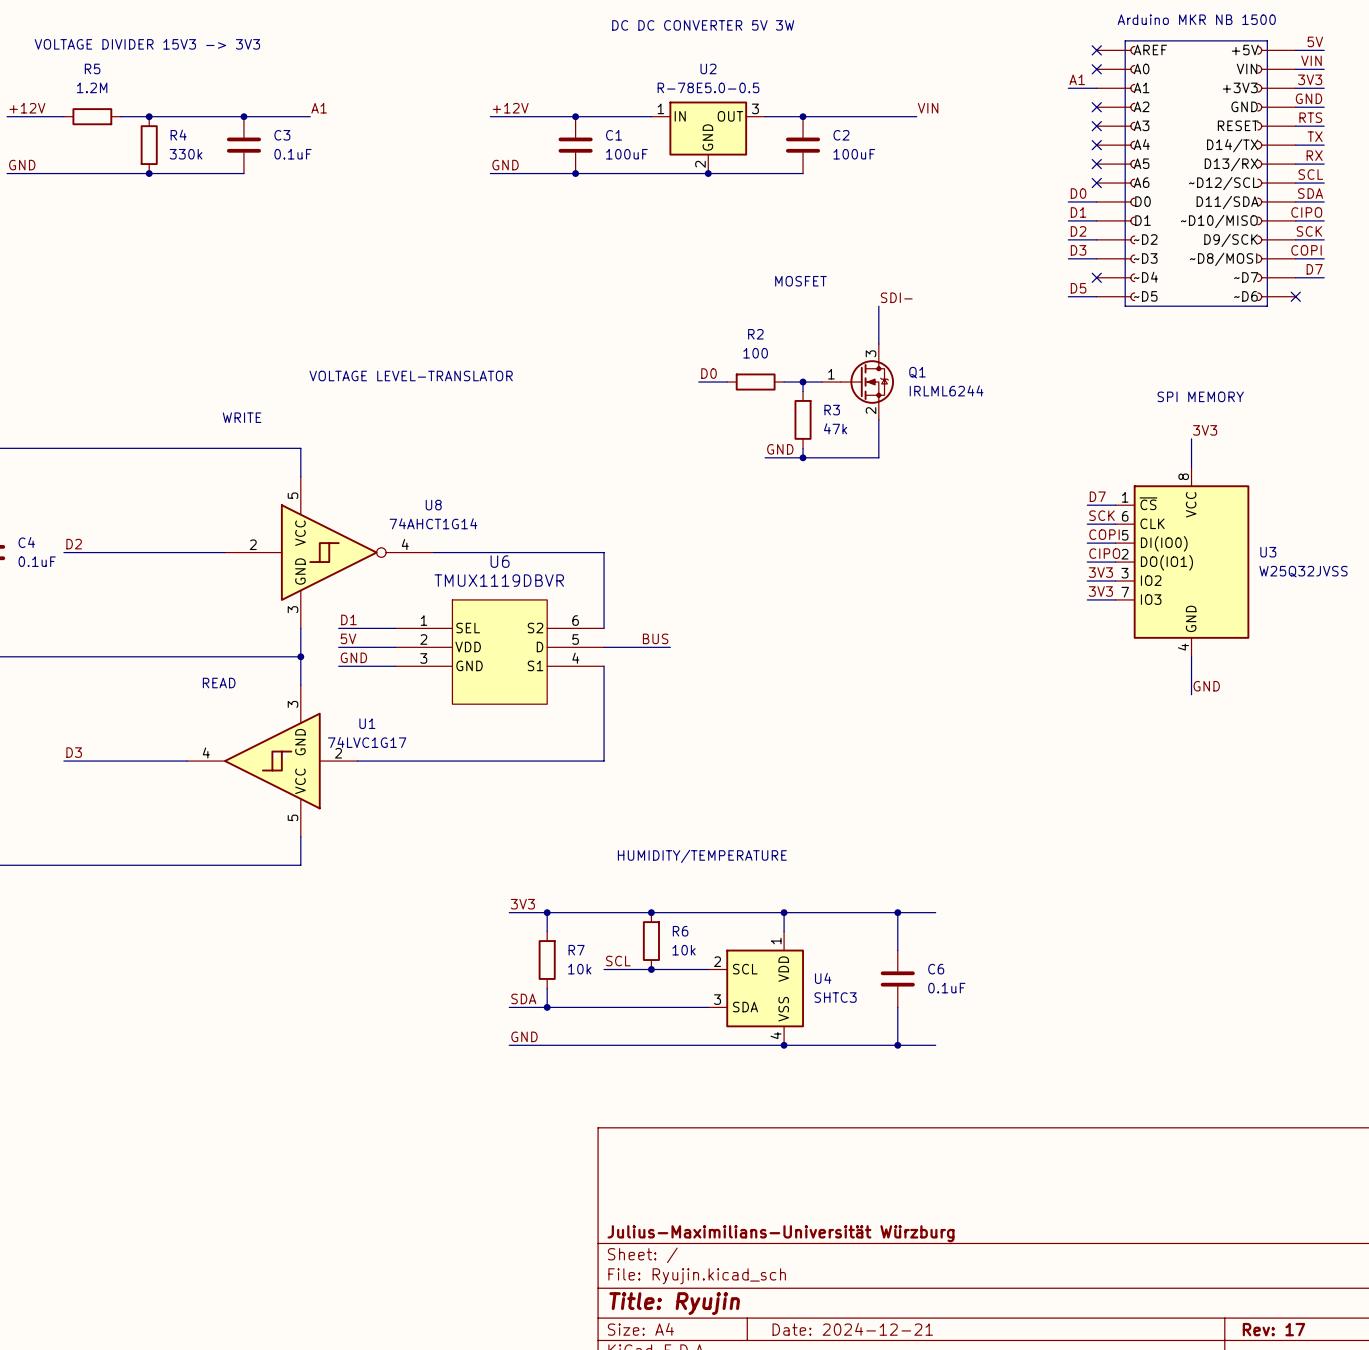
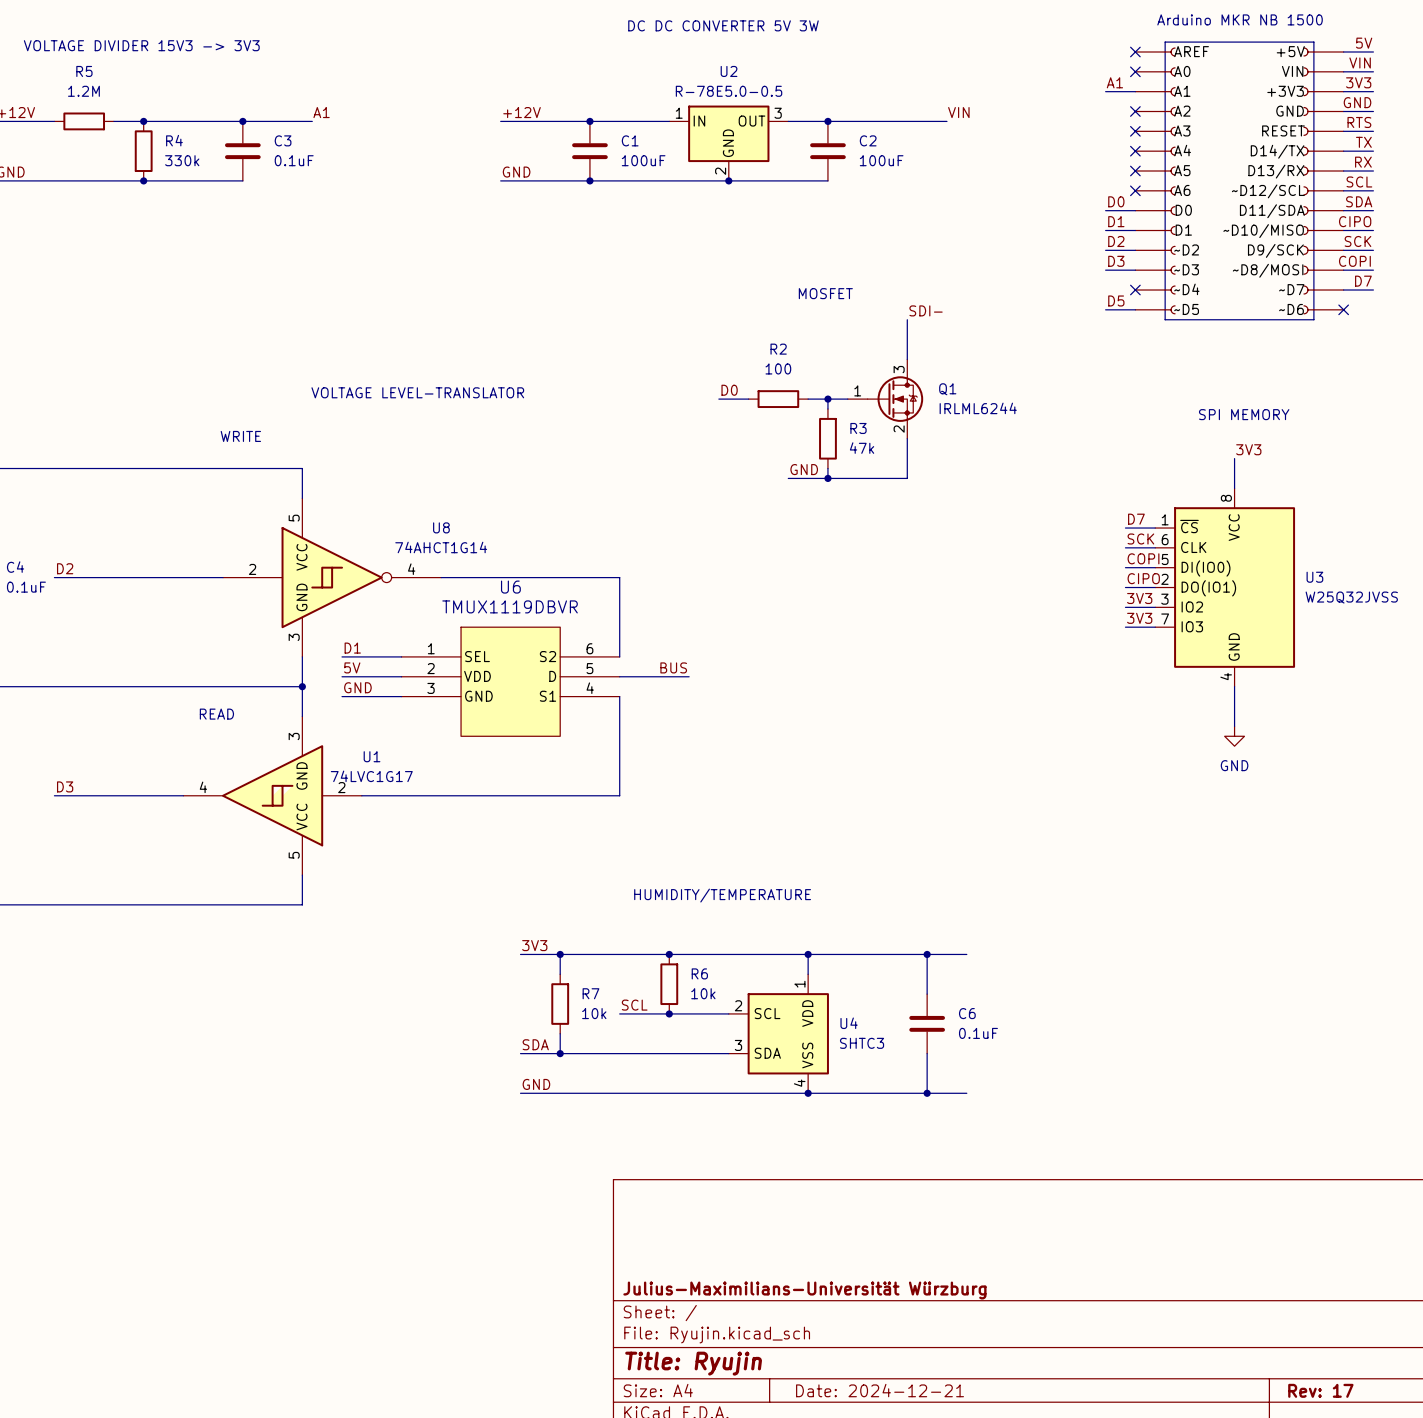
label: GND (1206, 686) -> none
power symbol: none -> GND (1234, 736)

